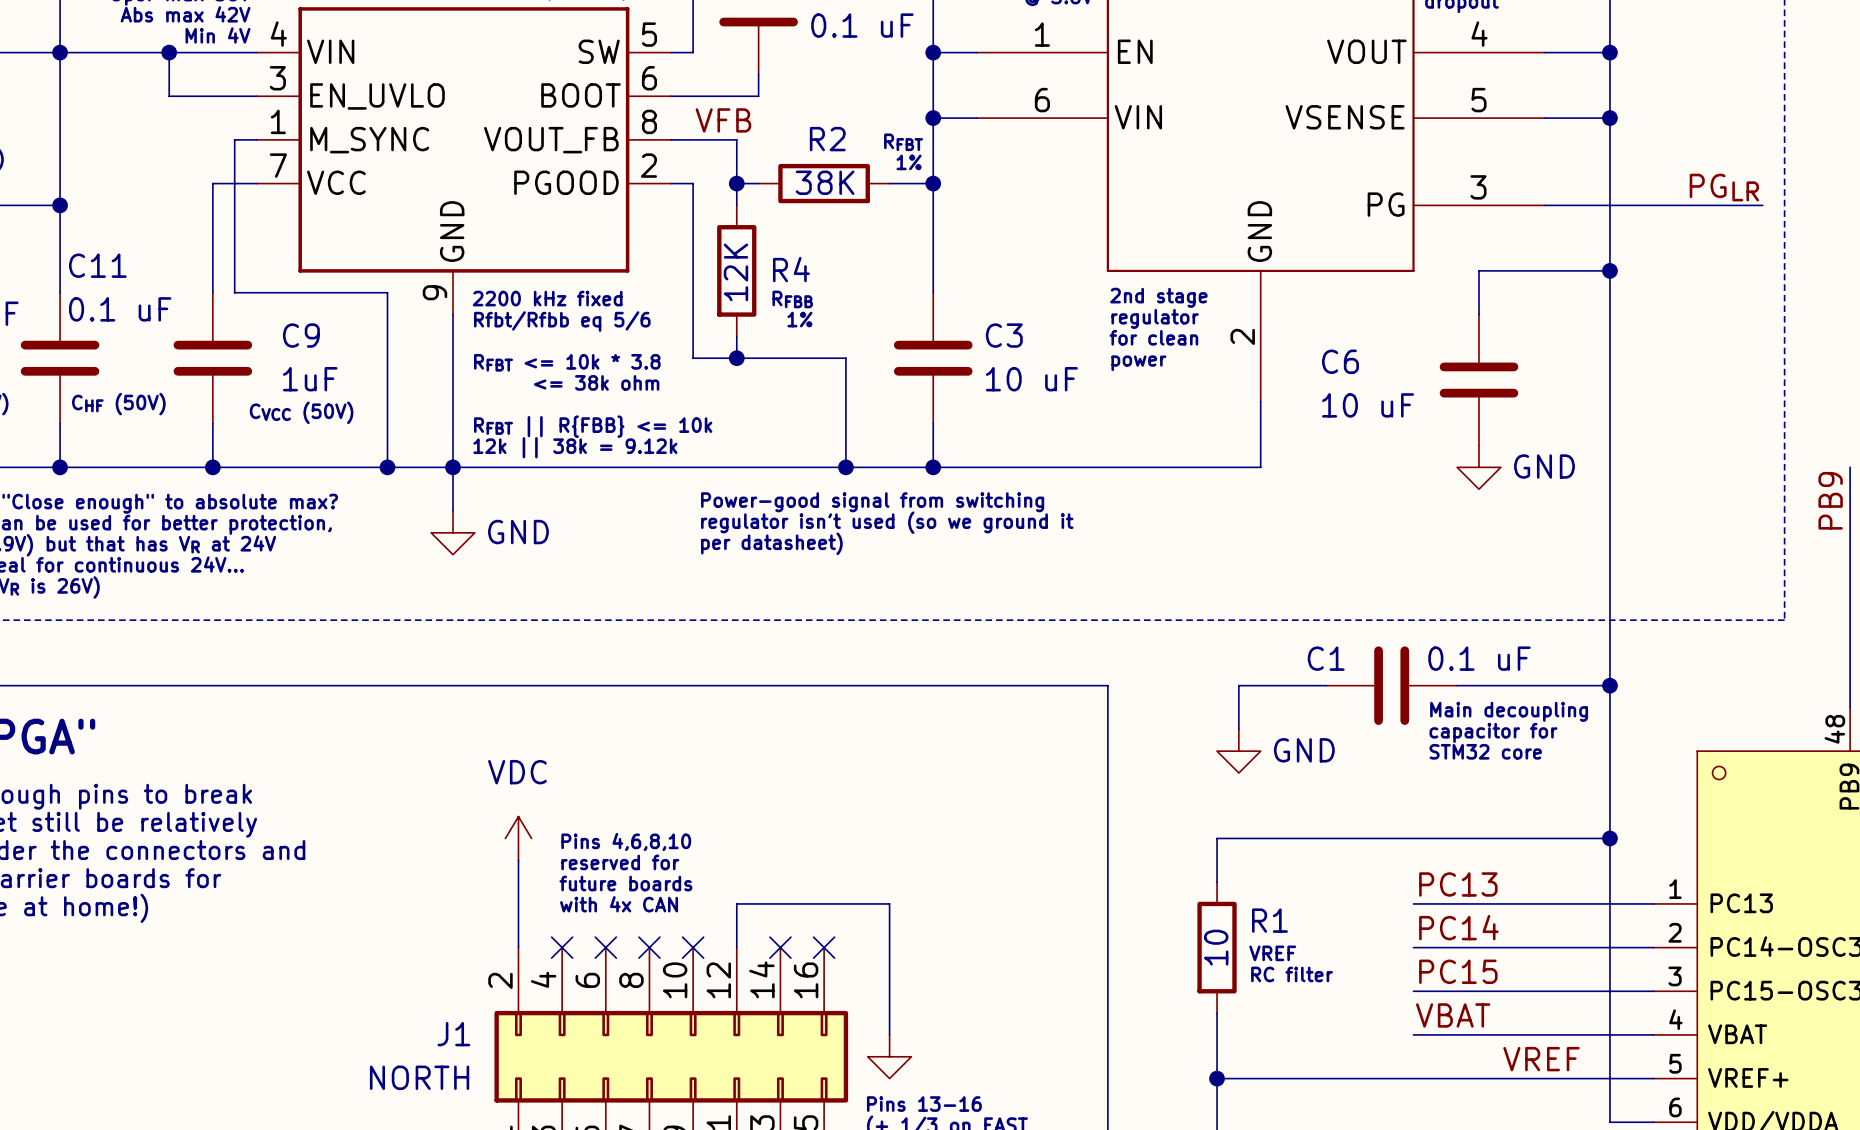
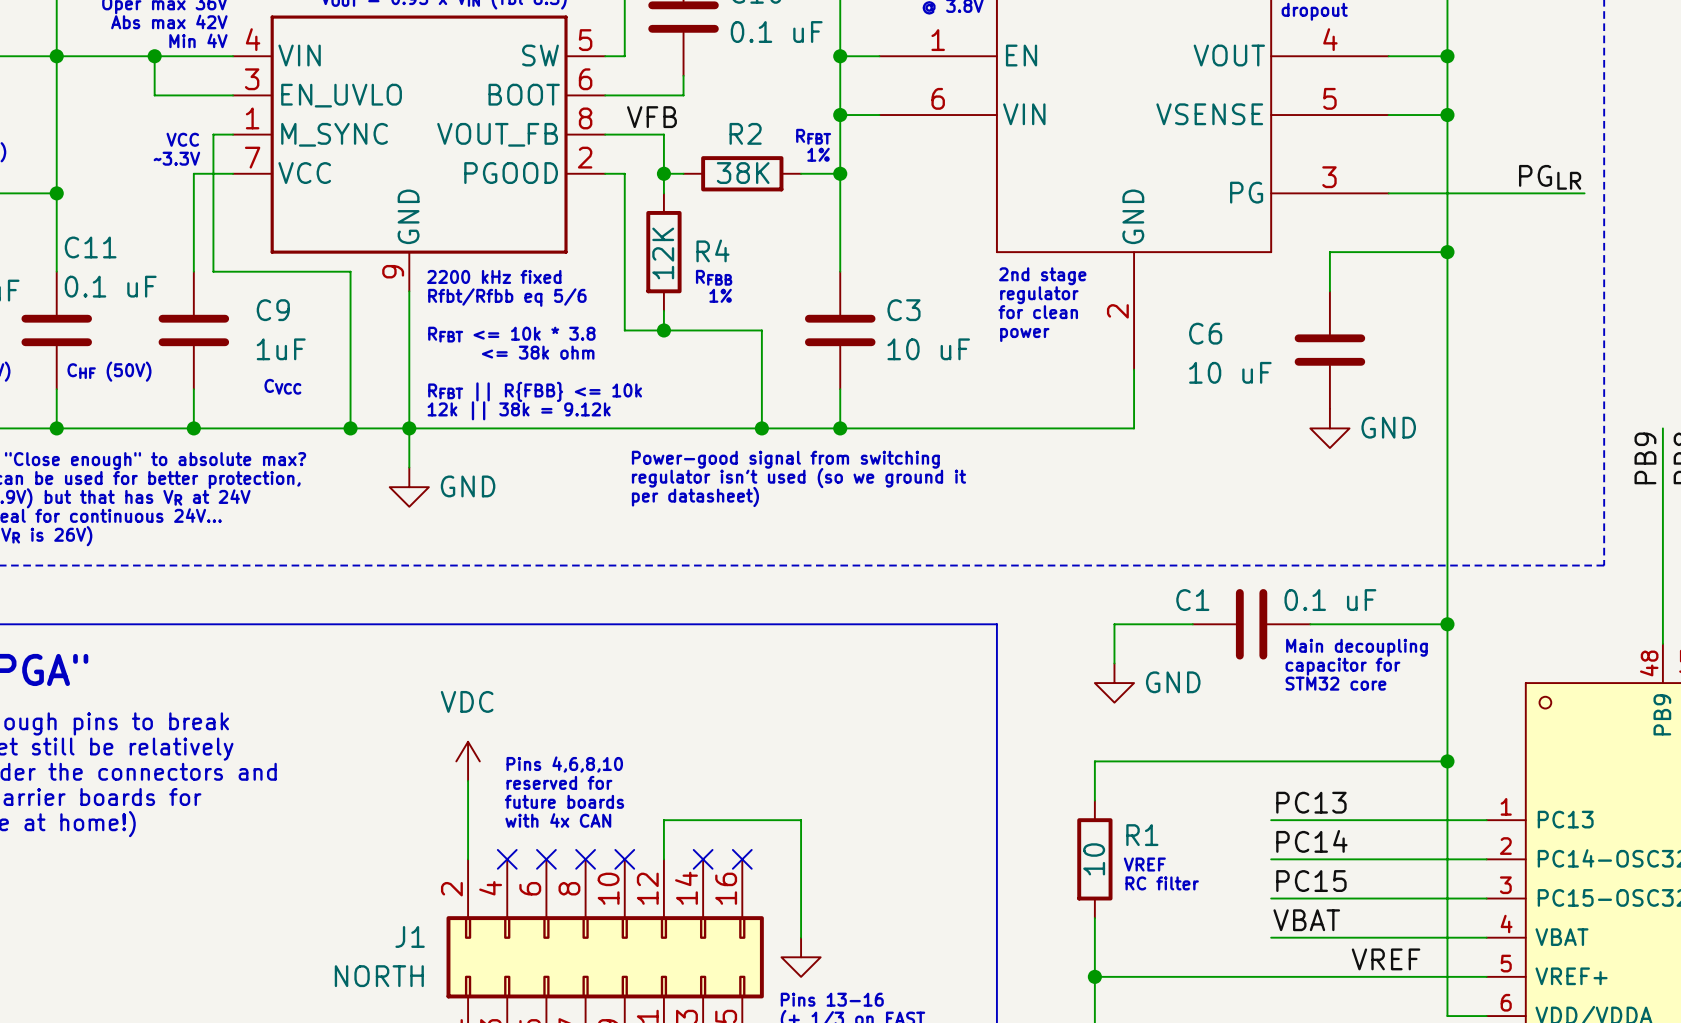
text: none -> VCC (182, 139)
text: none -> ~3.3V (176, 158)
text: CVCC (50V) (301, 412) -> CVCC (282, 386)

